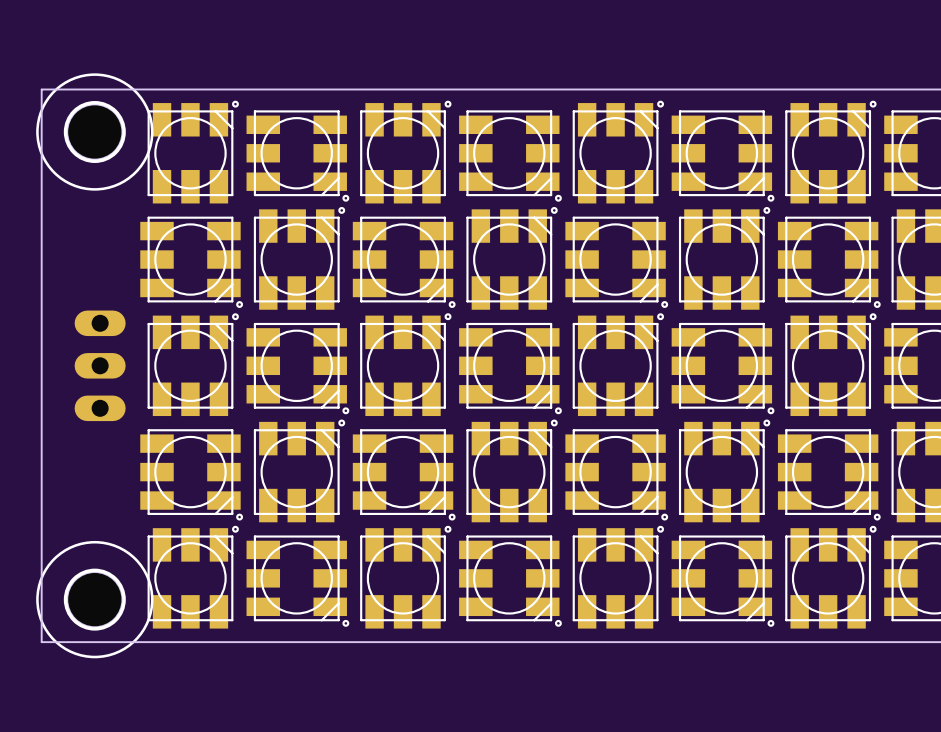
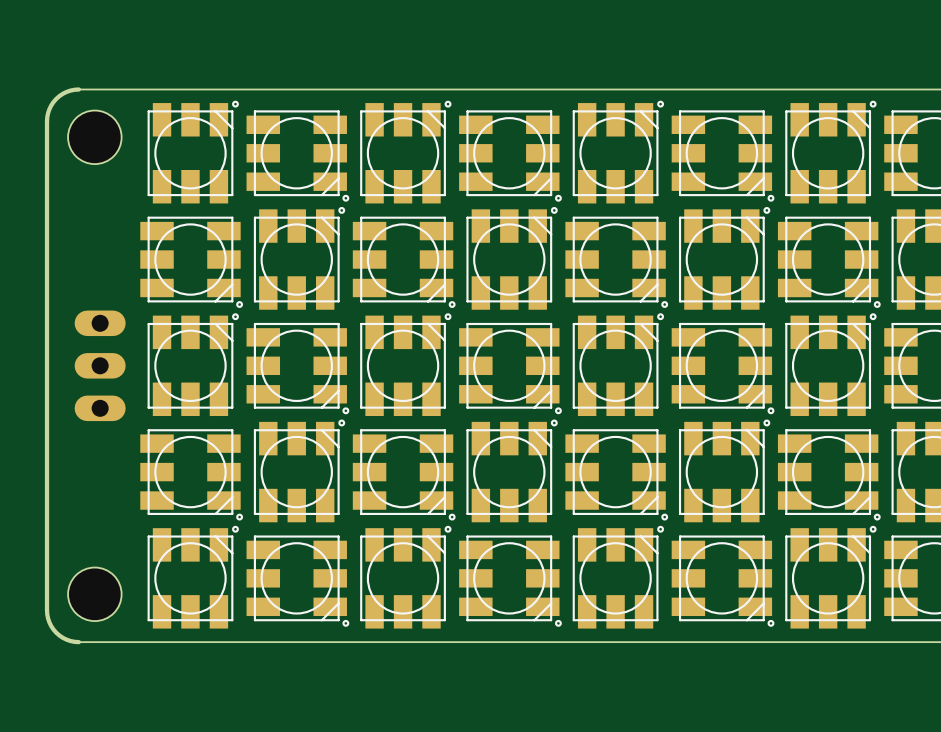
board edge: (41, 89) (41, 642) (78, 642) -> (78, 89) (66, 91) (56, 98) (49, 109) (47, 121) (47, 610) (49, 622) (56, 632) (66, 639) (78, 642)
board edge: (41, 89) (78, 89) -> none
part: (94, 132) -> none
hole: none -> (94, 137)
hole: none -> (94, 594)
part: (94, 599) -> none

